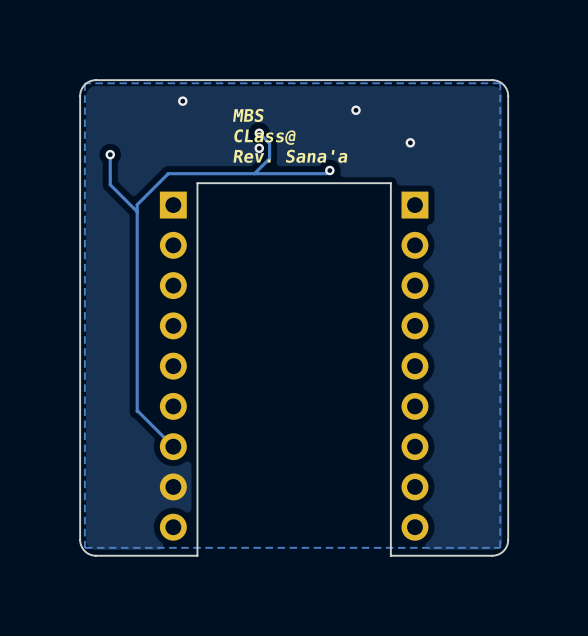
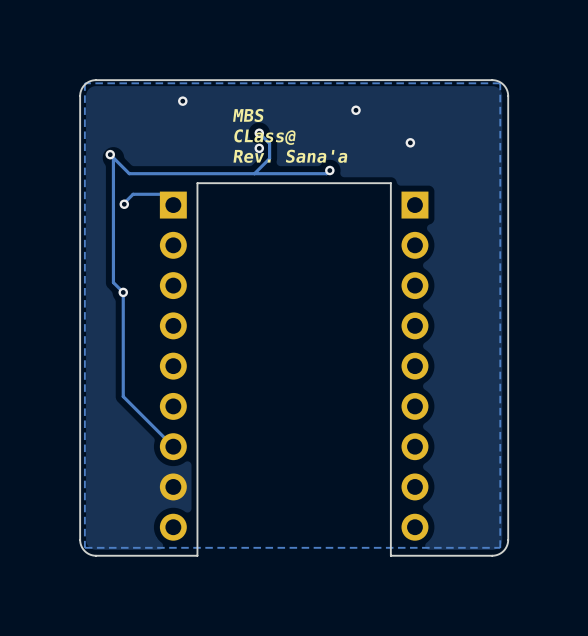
track: (110, 154) (110, 184) (137, 211) -> none
track: (168, 173) (137, 204) (138, 411) -> (168, 173) (129, 173) (113, 157) (113, 282) (123, 292) (123, 396) (138, 411)
track: none -> (124, 204) (133, 194) (165, 194) (173, 202) (173, 205)
via: none -> (124, 204)
via: none -> (123, 292)

